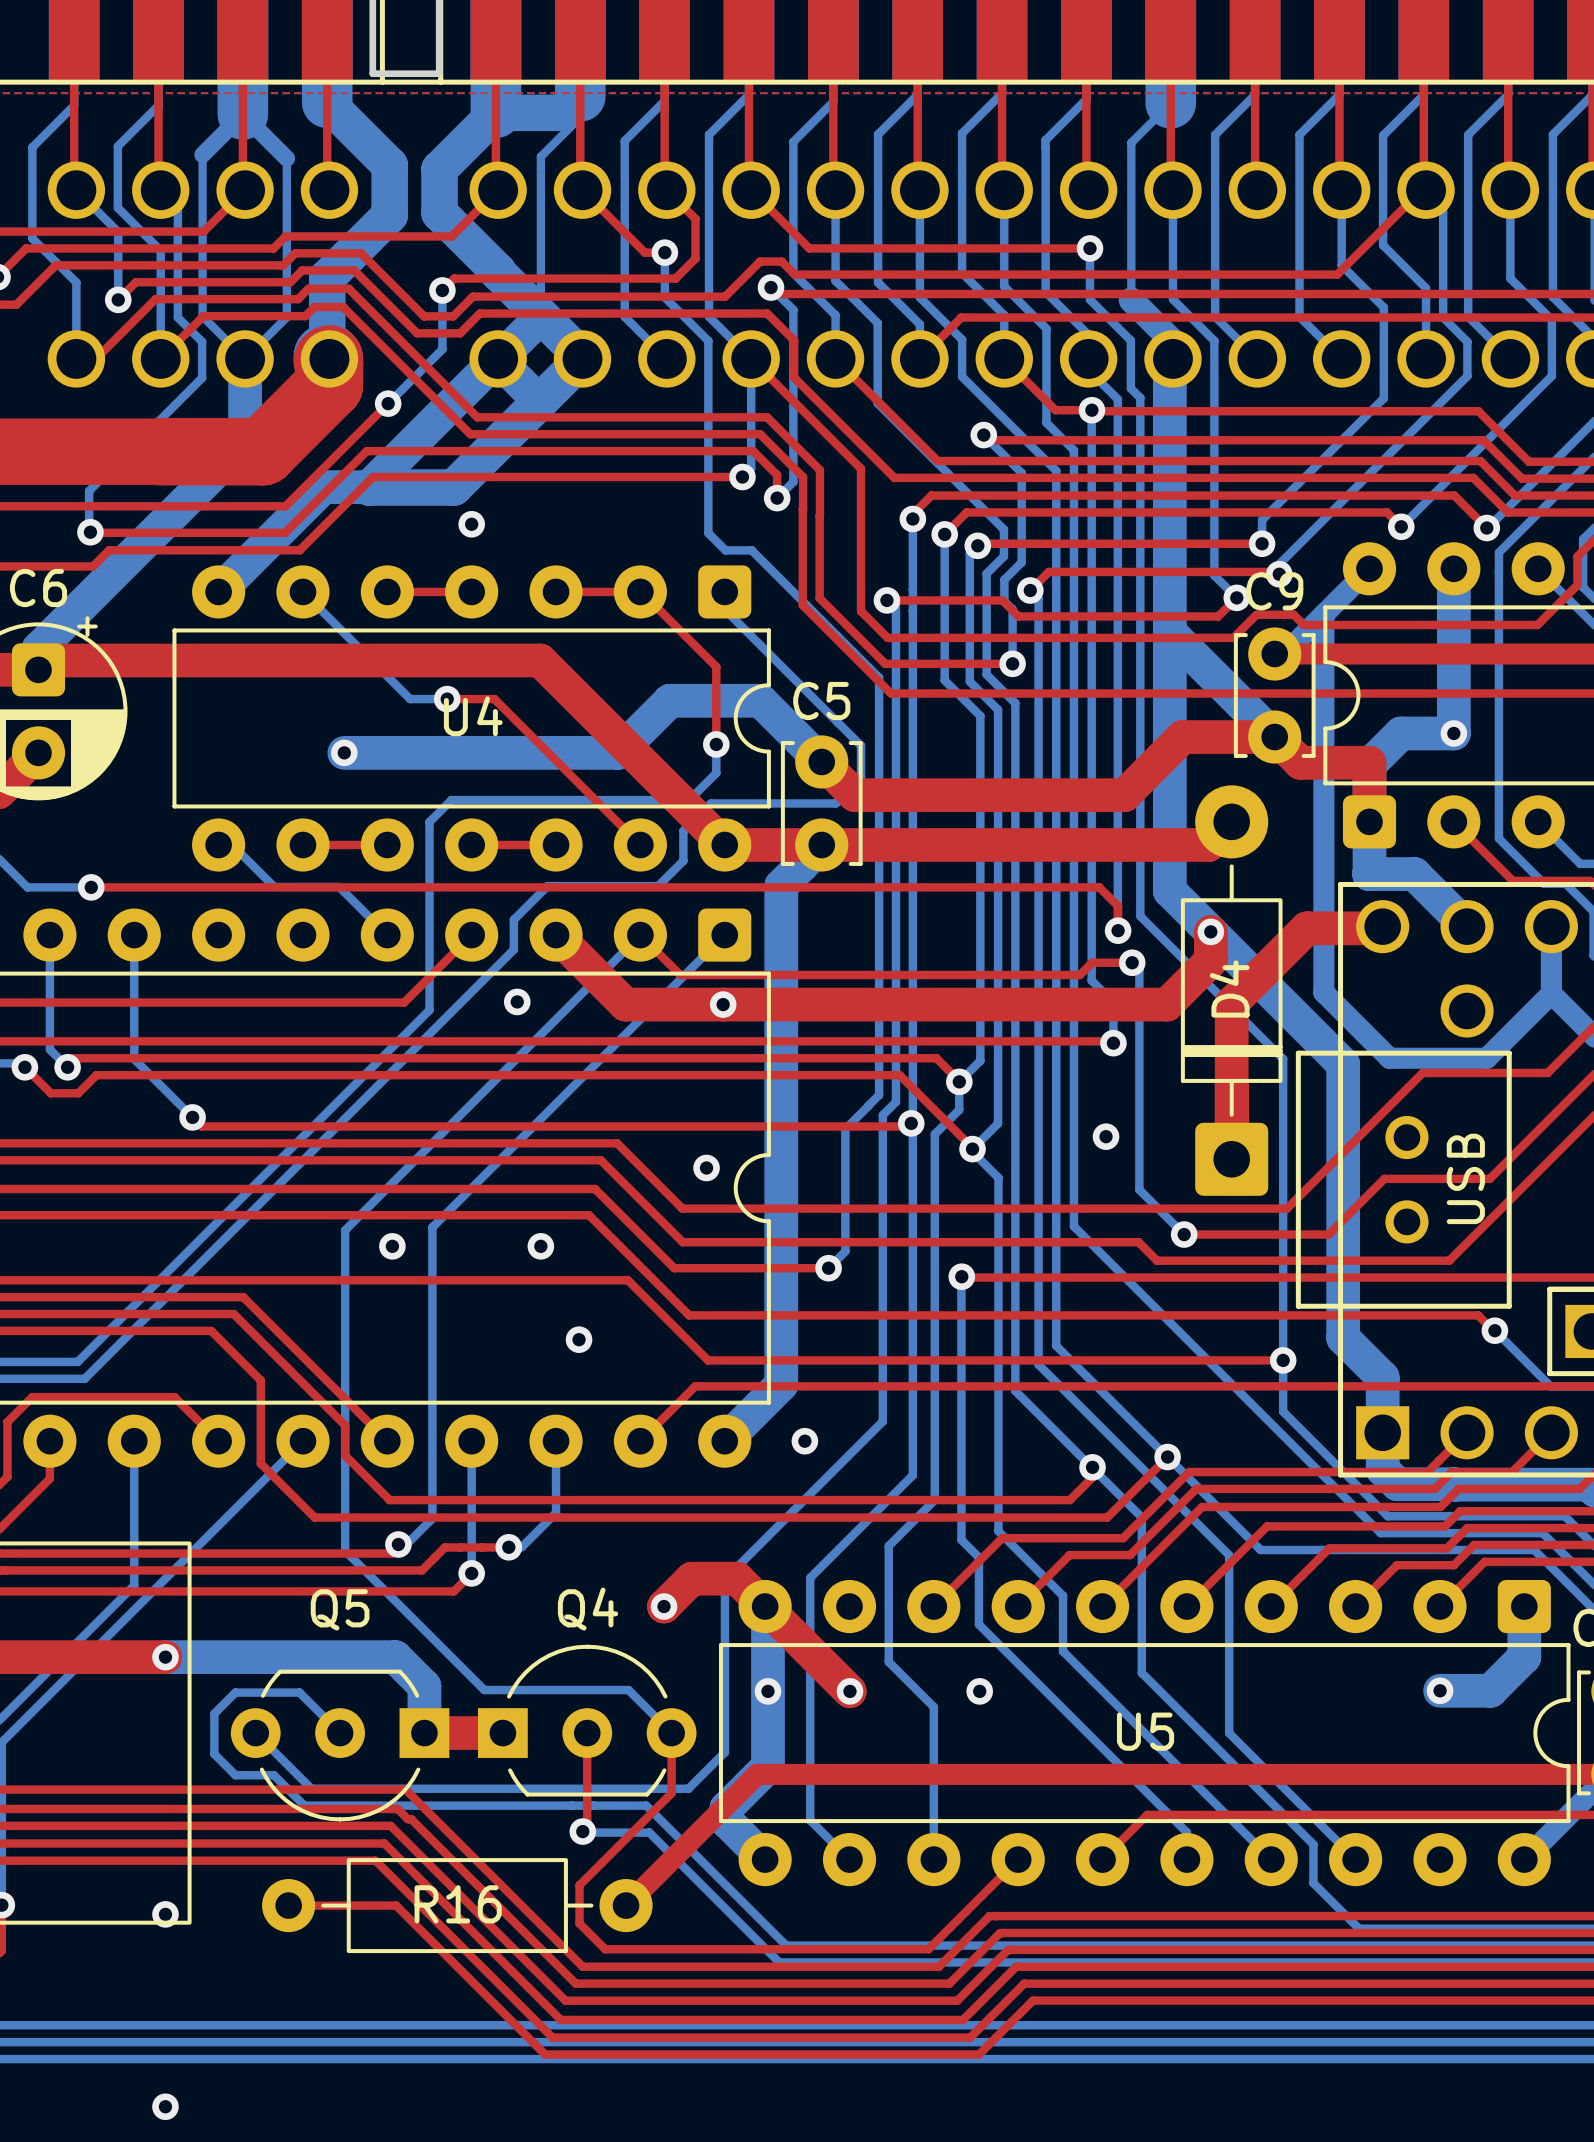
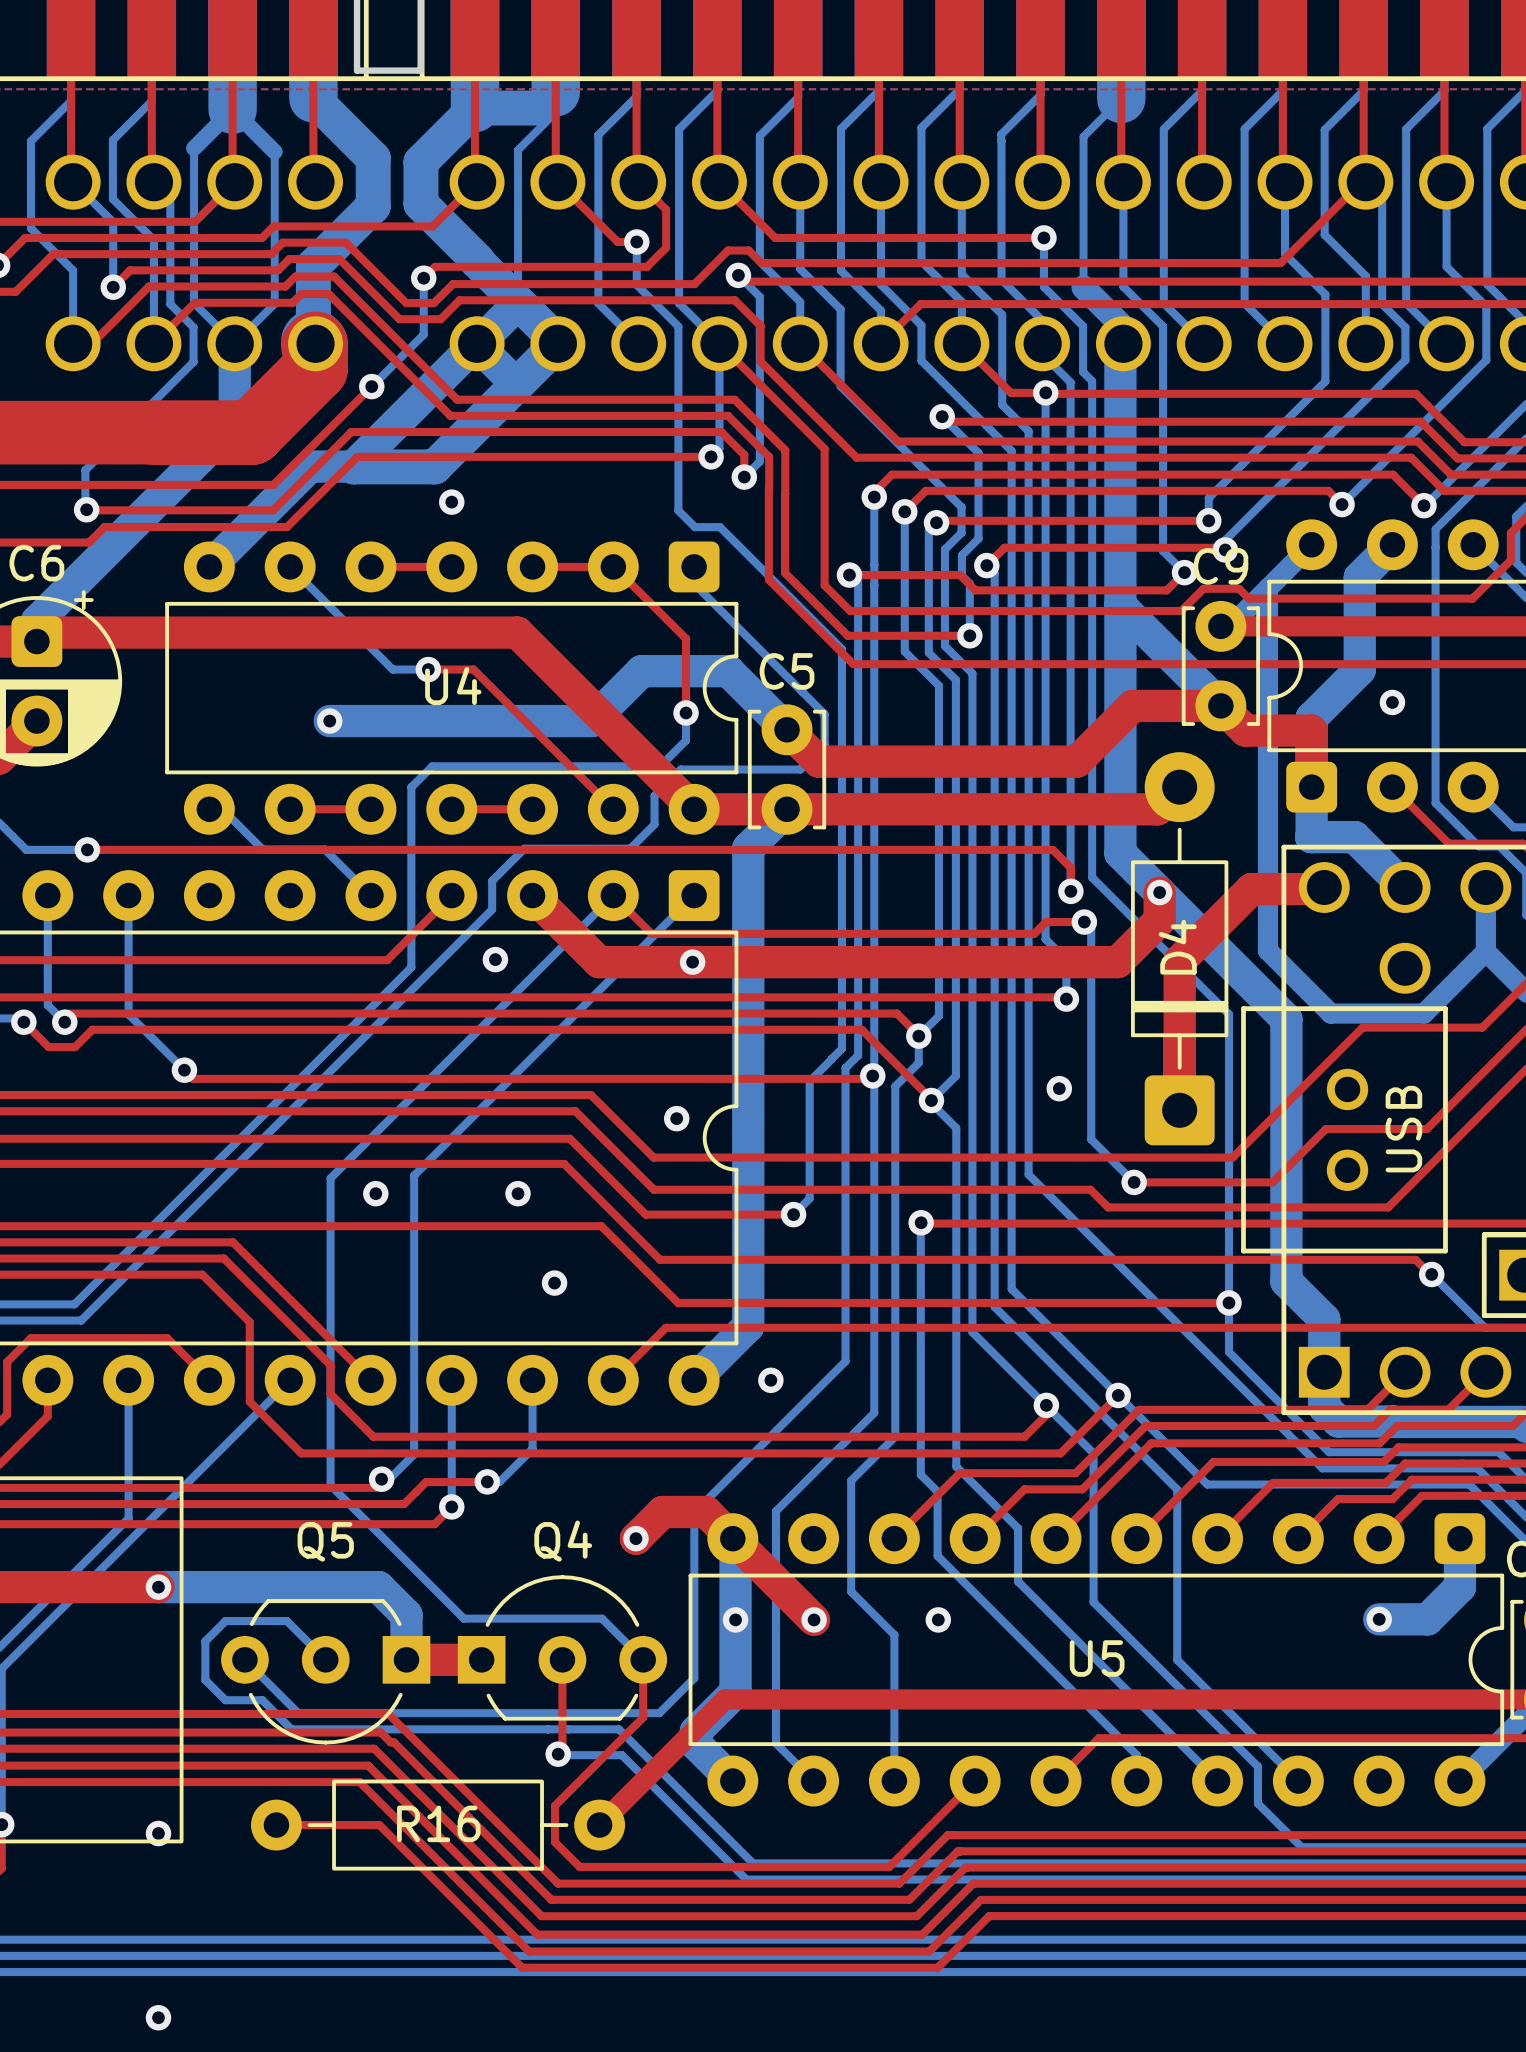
bottom track: (1453, 568) (1453, 733) (1400, 733) (1369, 764) -> (1392, 544) (1359, 577) (1359, 669) (1311, 717) (1311, 732)

